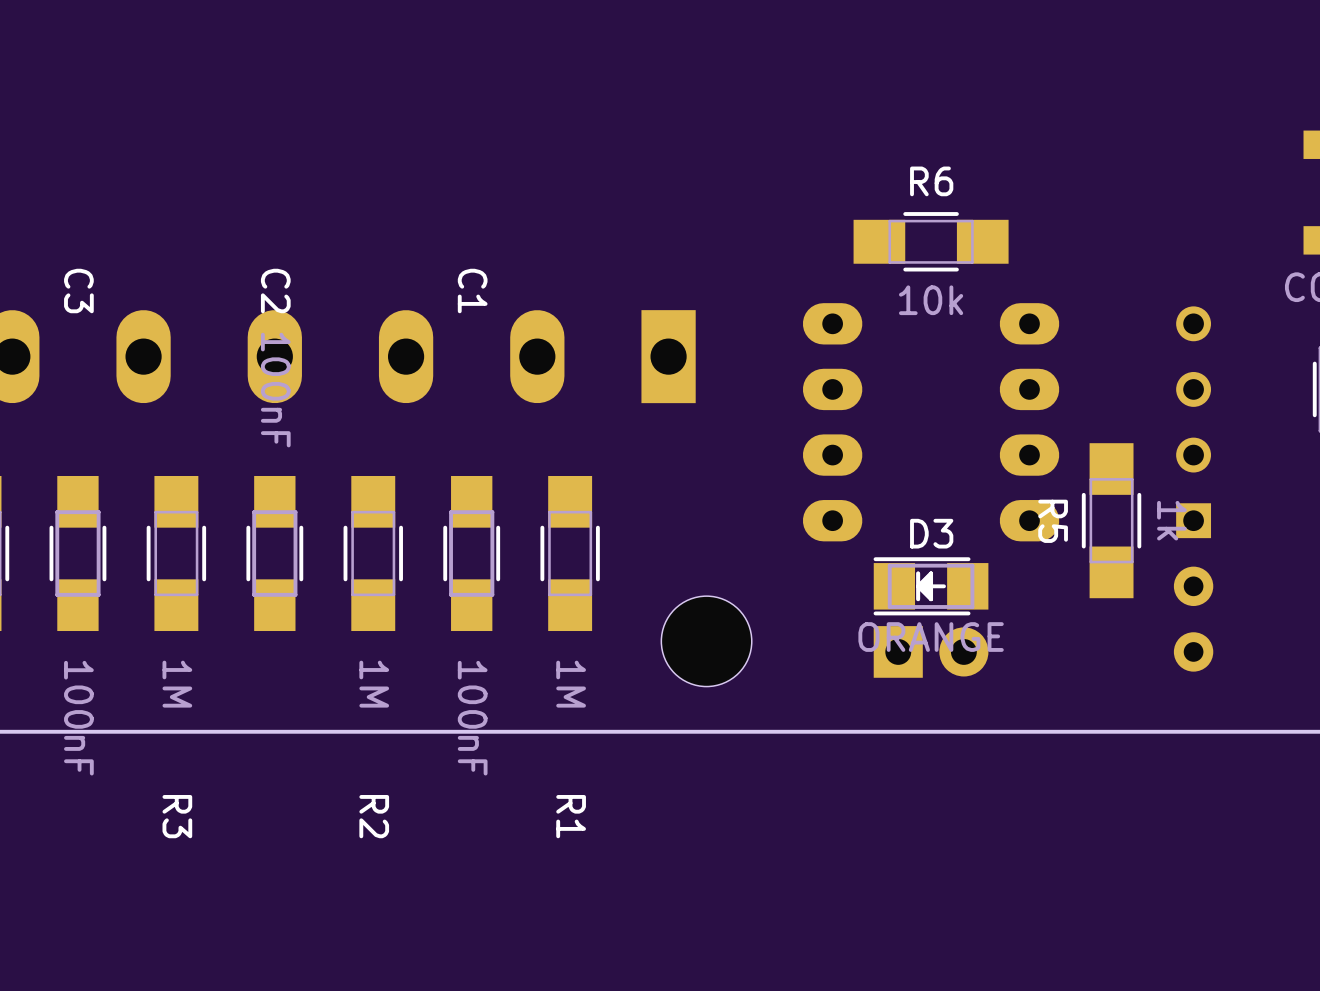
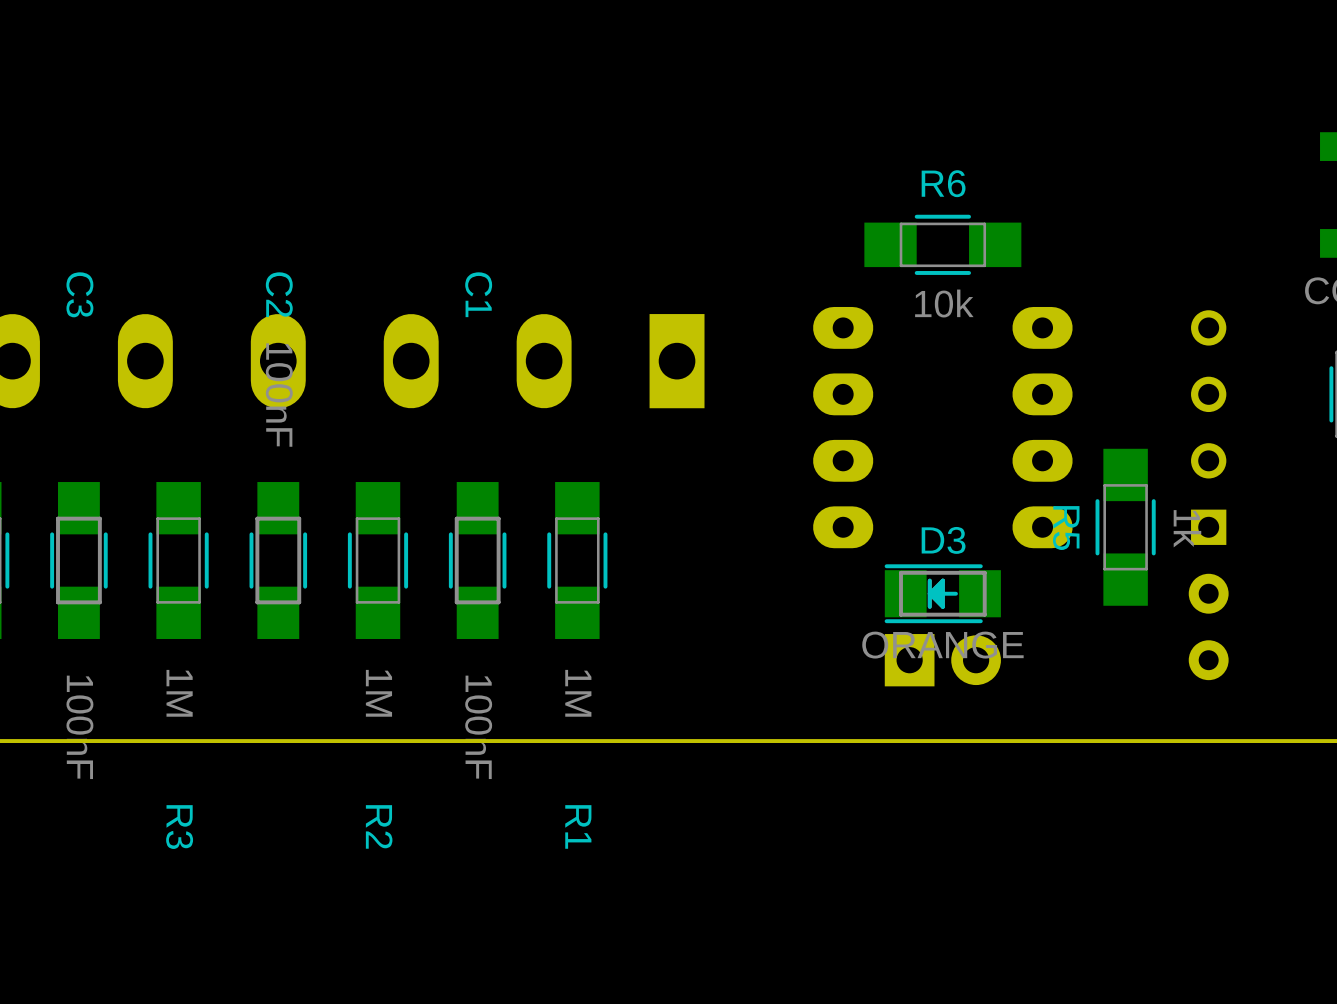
part: (706, 641) -> none

